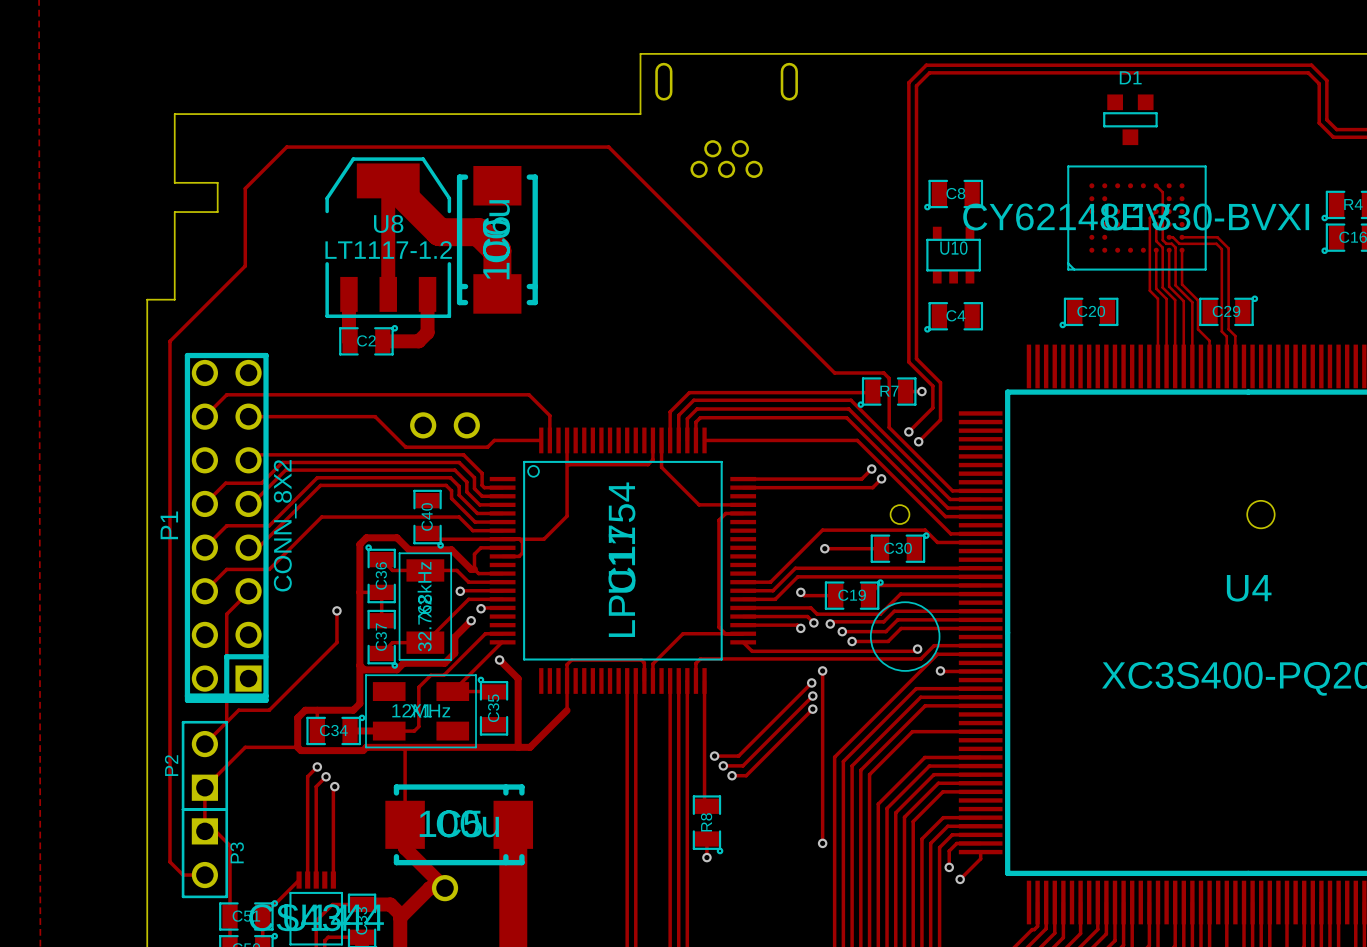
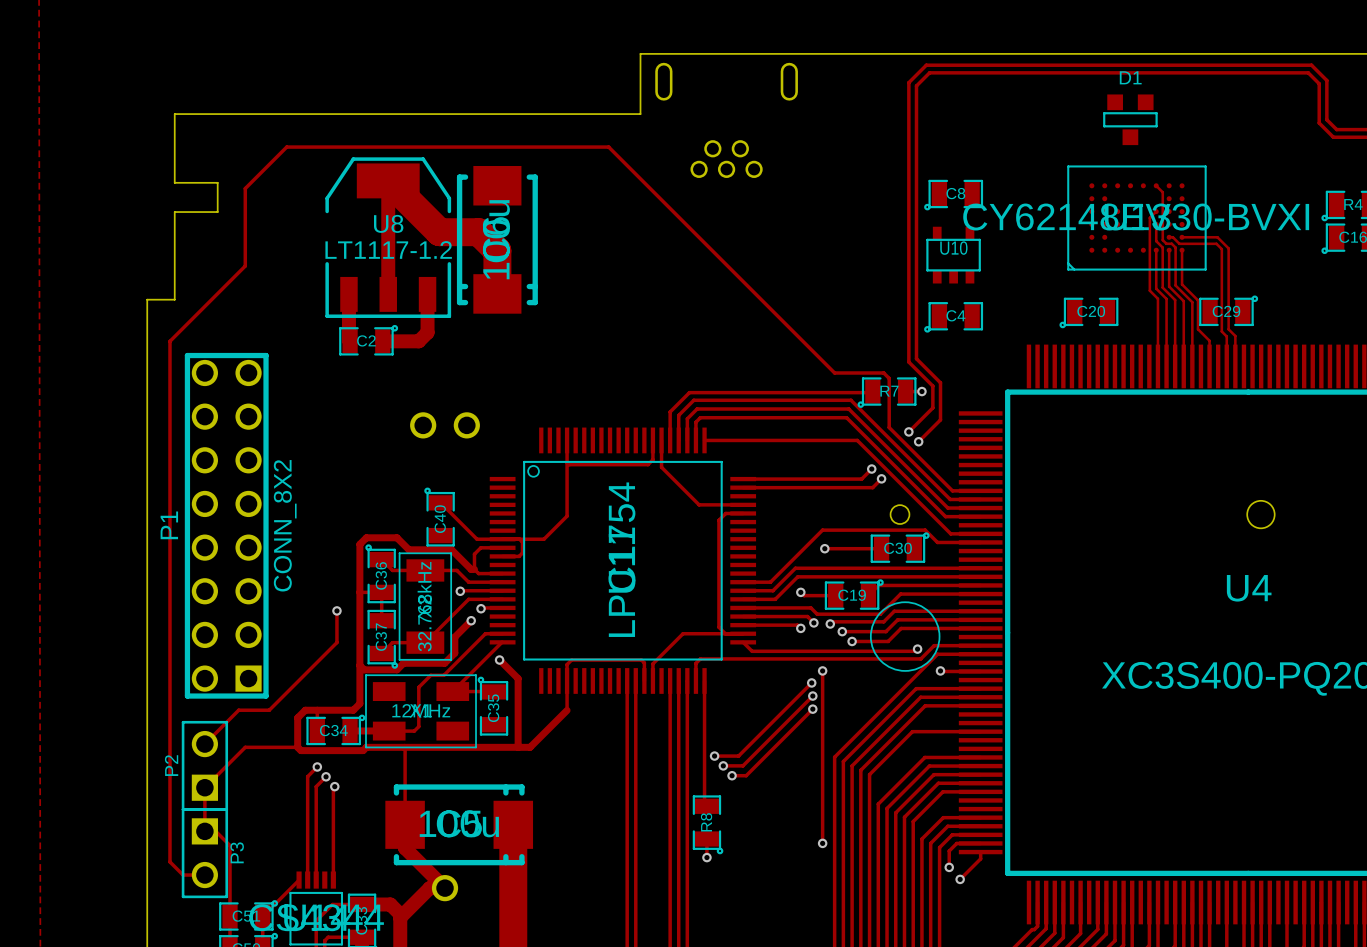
track: (204, 416) (226, 394) (529, 394) (549, 415) (549, 440) -> none
track: (248, 416) (375, 416) (405, 447) (487, 447) (494, 440) (541, 440) -> none
track: (248, 460) (254, 454) (463, 454) (482, 473) (482, 485) (484, 487) (502, 487) -> none
track: (502, 496) (482, 496) (474, 488) (474, 477) (459, 462) (282, 462) (261, 483) (225, 483) (204, 503) -> none
track: (248, 503) (251, 503) (285, 470) (454, 470) (466, 482) (466, 491) (479, 504) (502, 504) -> none
track: (502, 513) (477, 513) (459, 495) (459, 486) (450, 477) (317, 477) (269, 525) (226, 525) (204, 547) -> none
C40 rotation: 0° (428, 519) -> 180° (439, 517)
track: (502, 522) (475, 522) (451, 498) (451, 490) (446, 485) (320, 485) (258, 547) (248, 547) -> none
track: (502, 530) (472, 530) (459, 517) (321, 517) (269, 569) (226, 569) (204, 591) -> none
track: (427, 533) (433, 539) (477, 539) -> (440, 502) (477, 539)
track: (248, 591) (226, 614) (226, 722) -> none
line: (266, 656) (226, 656) (226, 696) -> none
line: (187, 696) (187, 700) (266, 700) (266, 696) -> none

